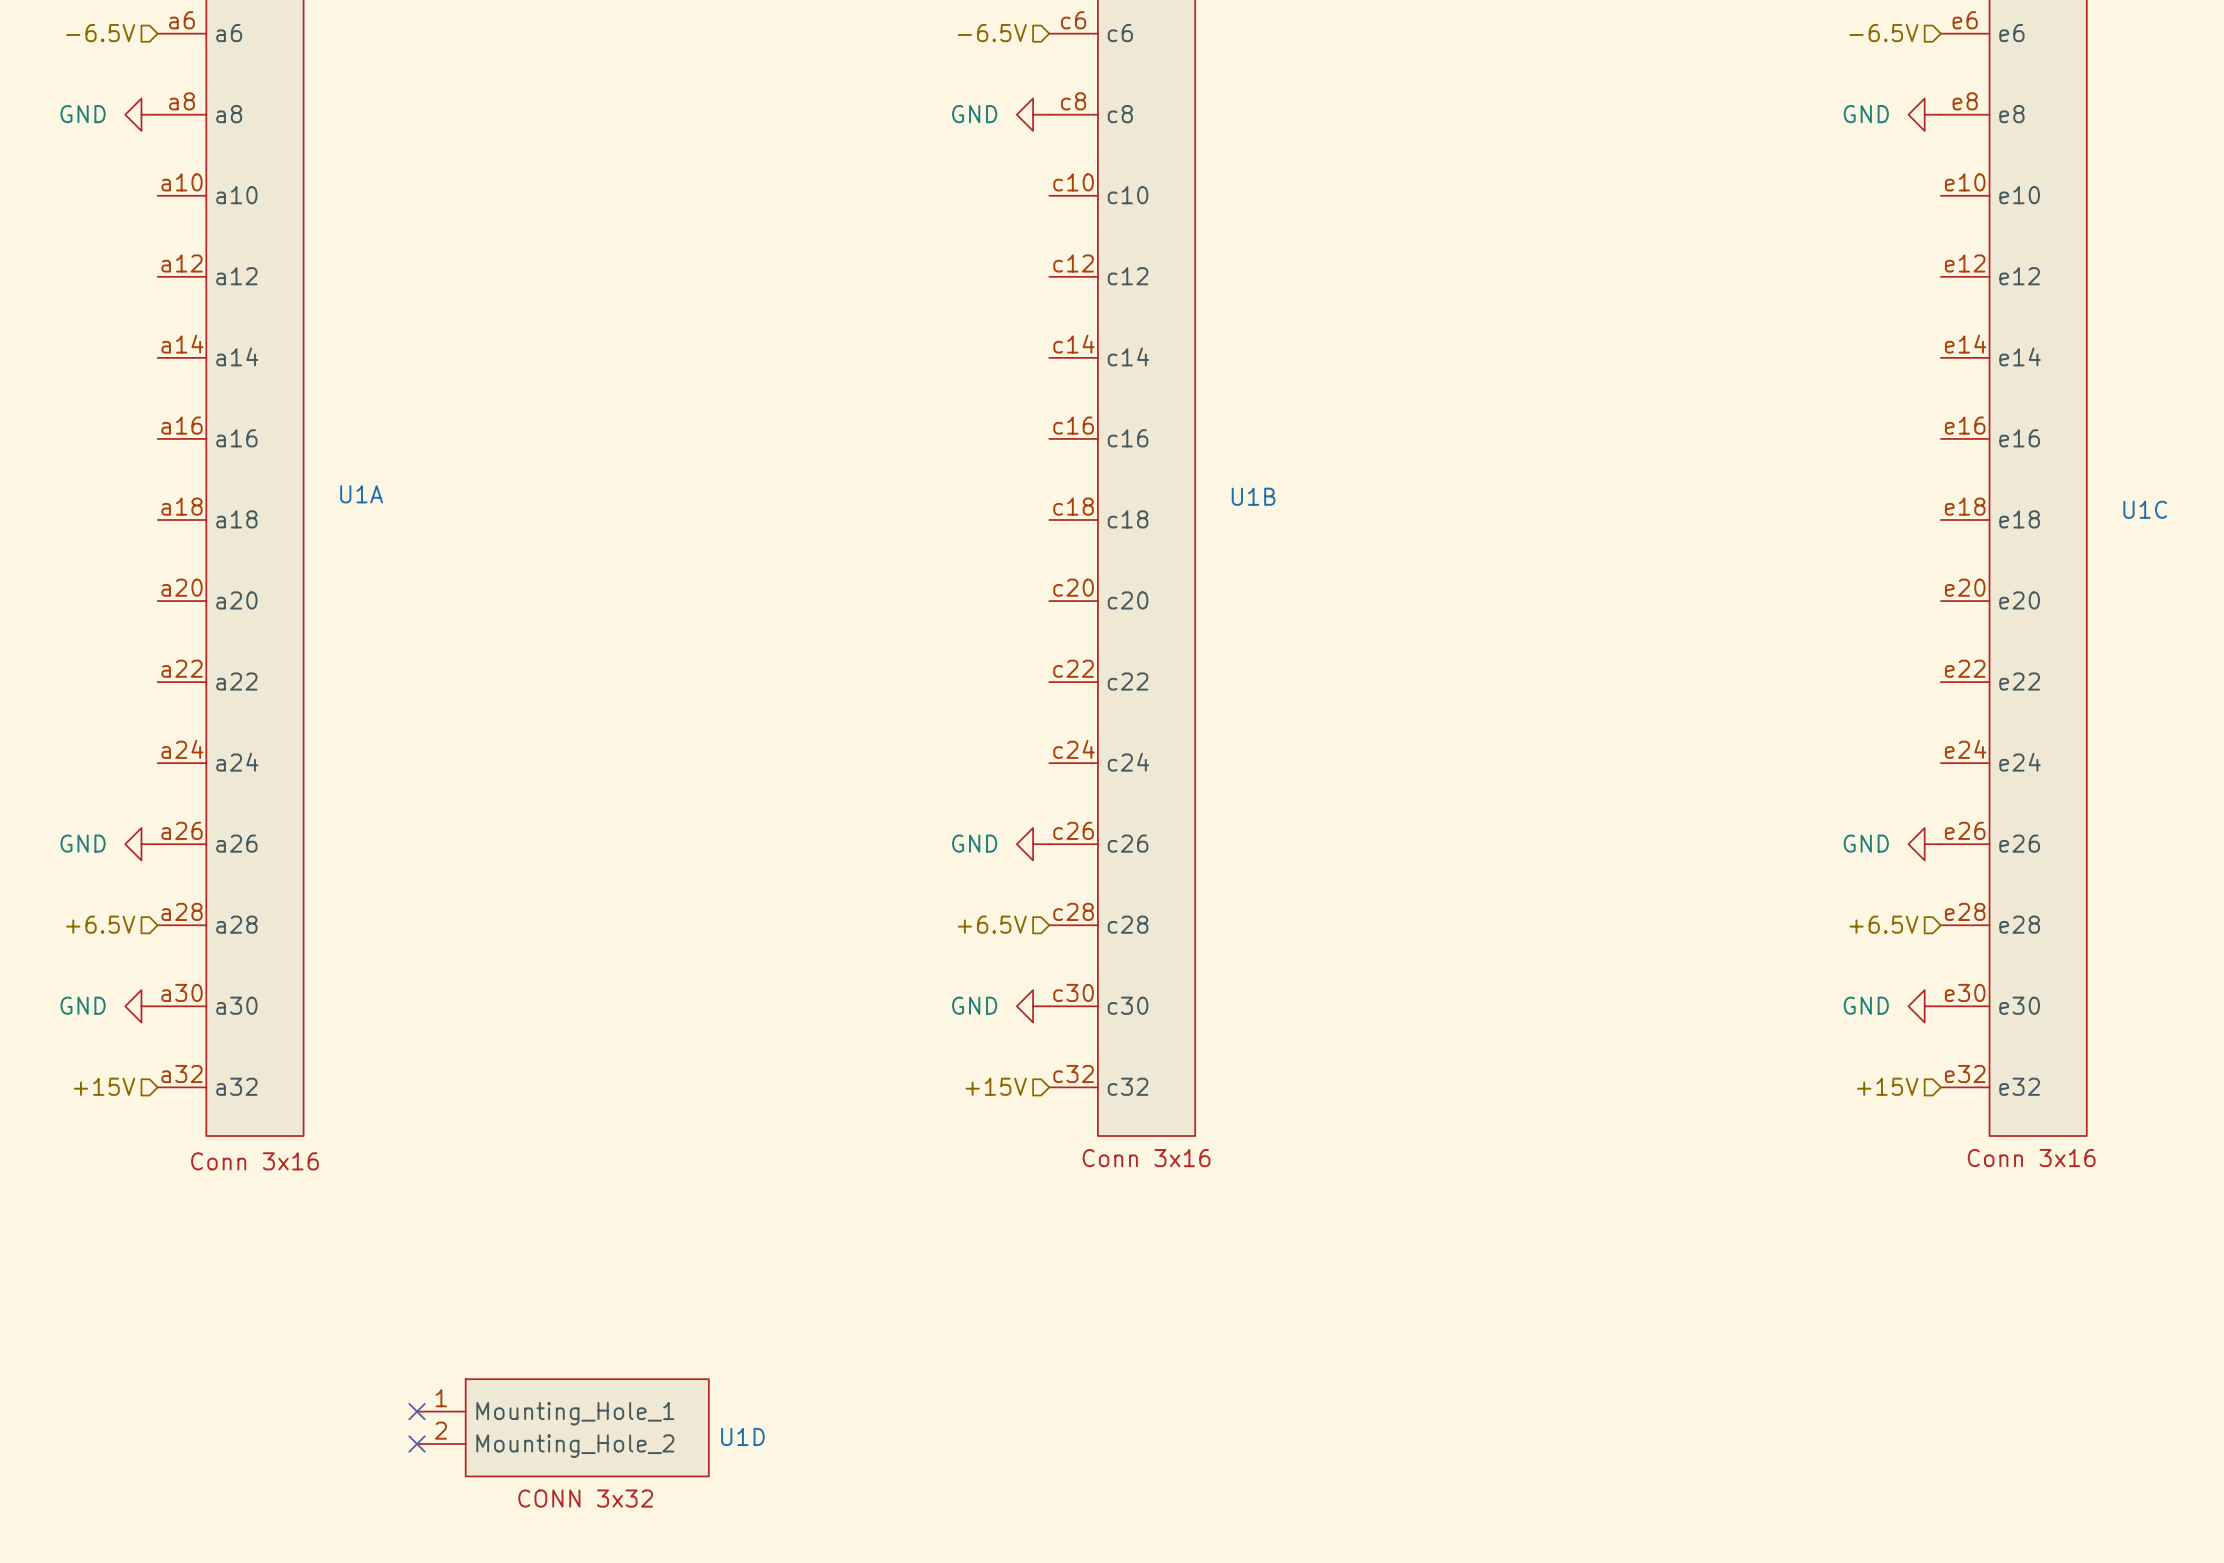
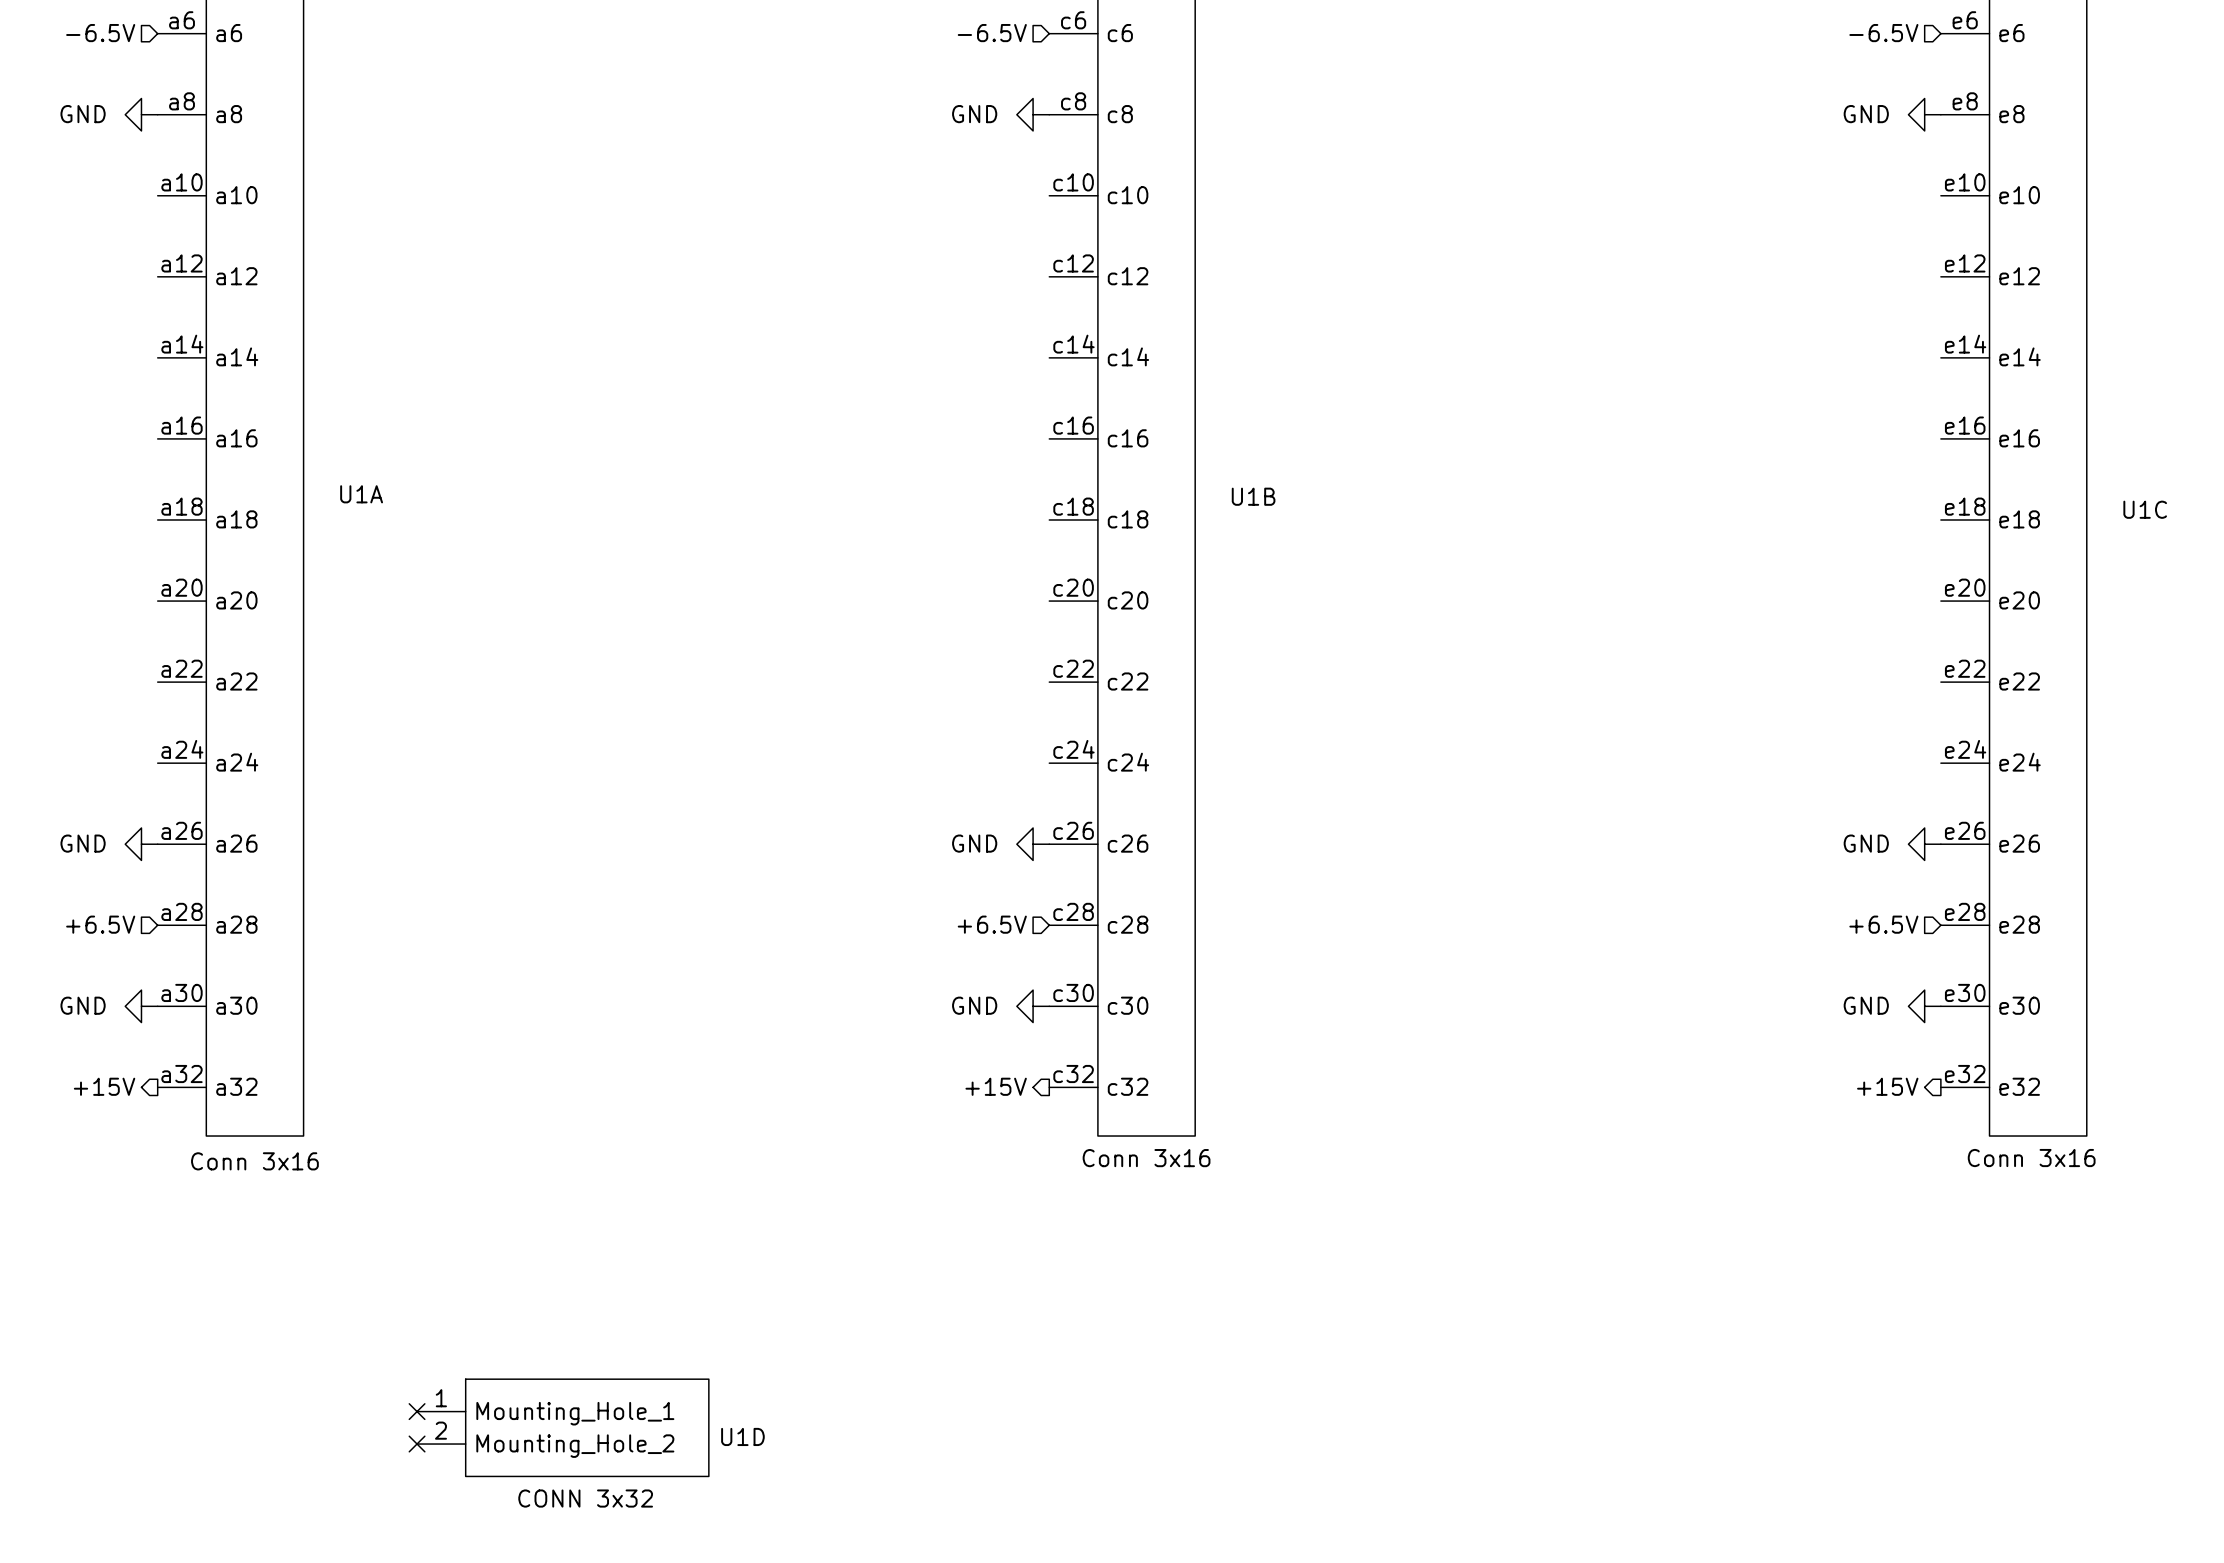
hierarchical label shape: input (104, 1086) -> output (104, 1086)
hierarchical label shape: input (996, 1086) -> output (996, 1086)
hierarchical label shape: input (1887, 1086) -> output (1887, 1086)

